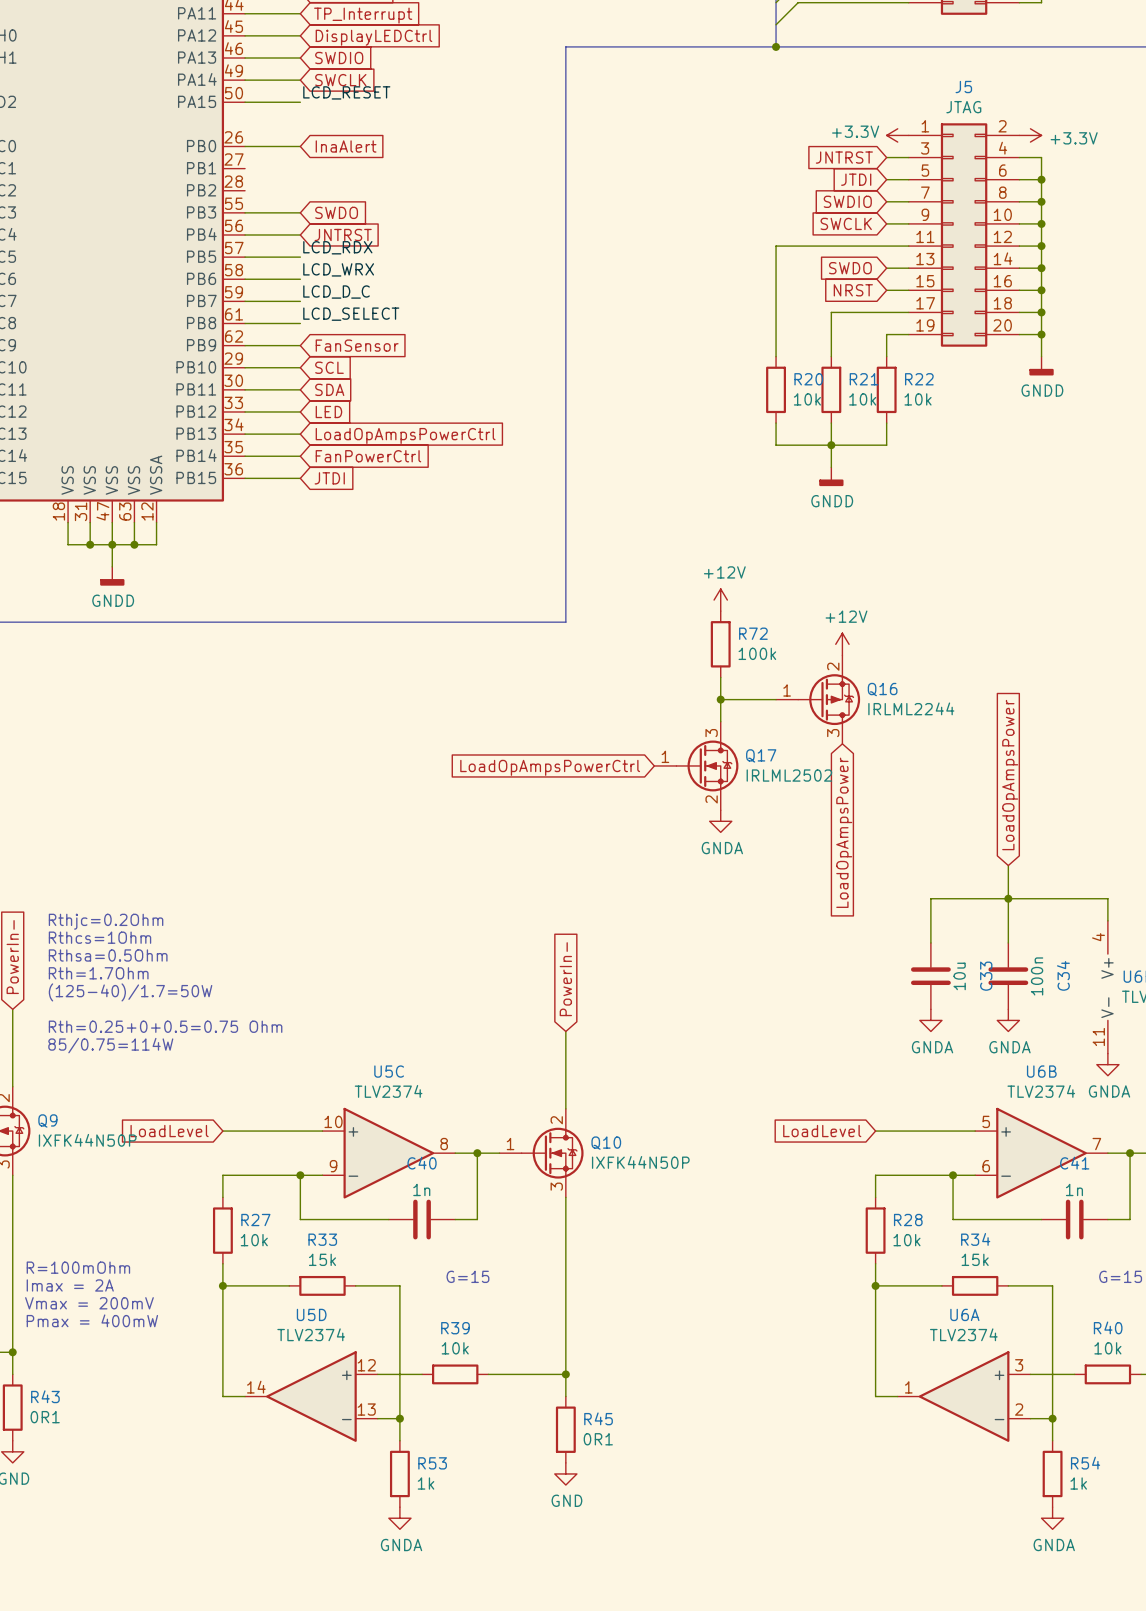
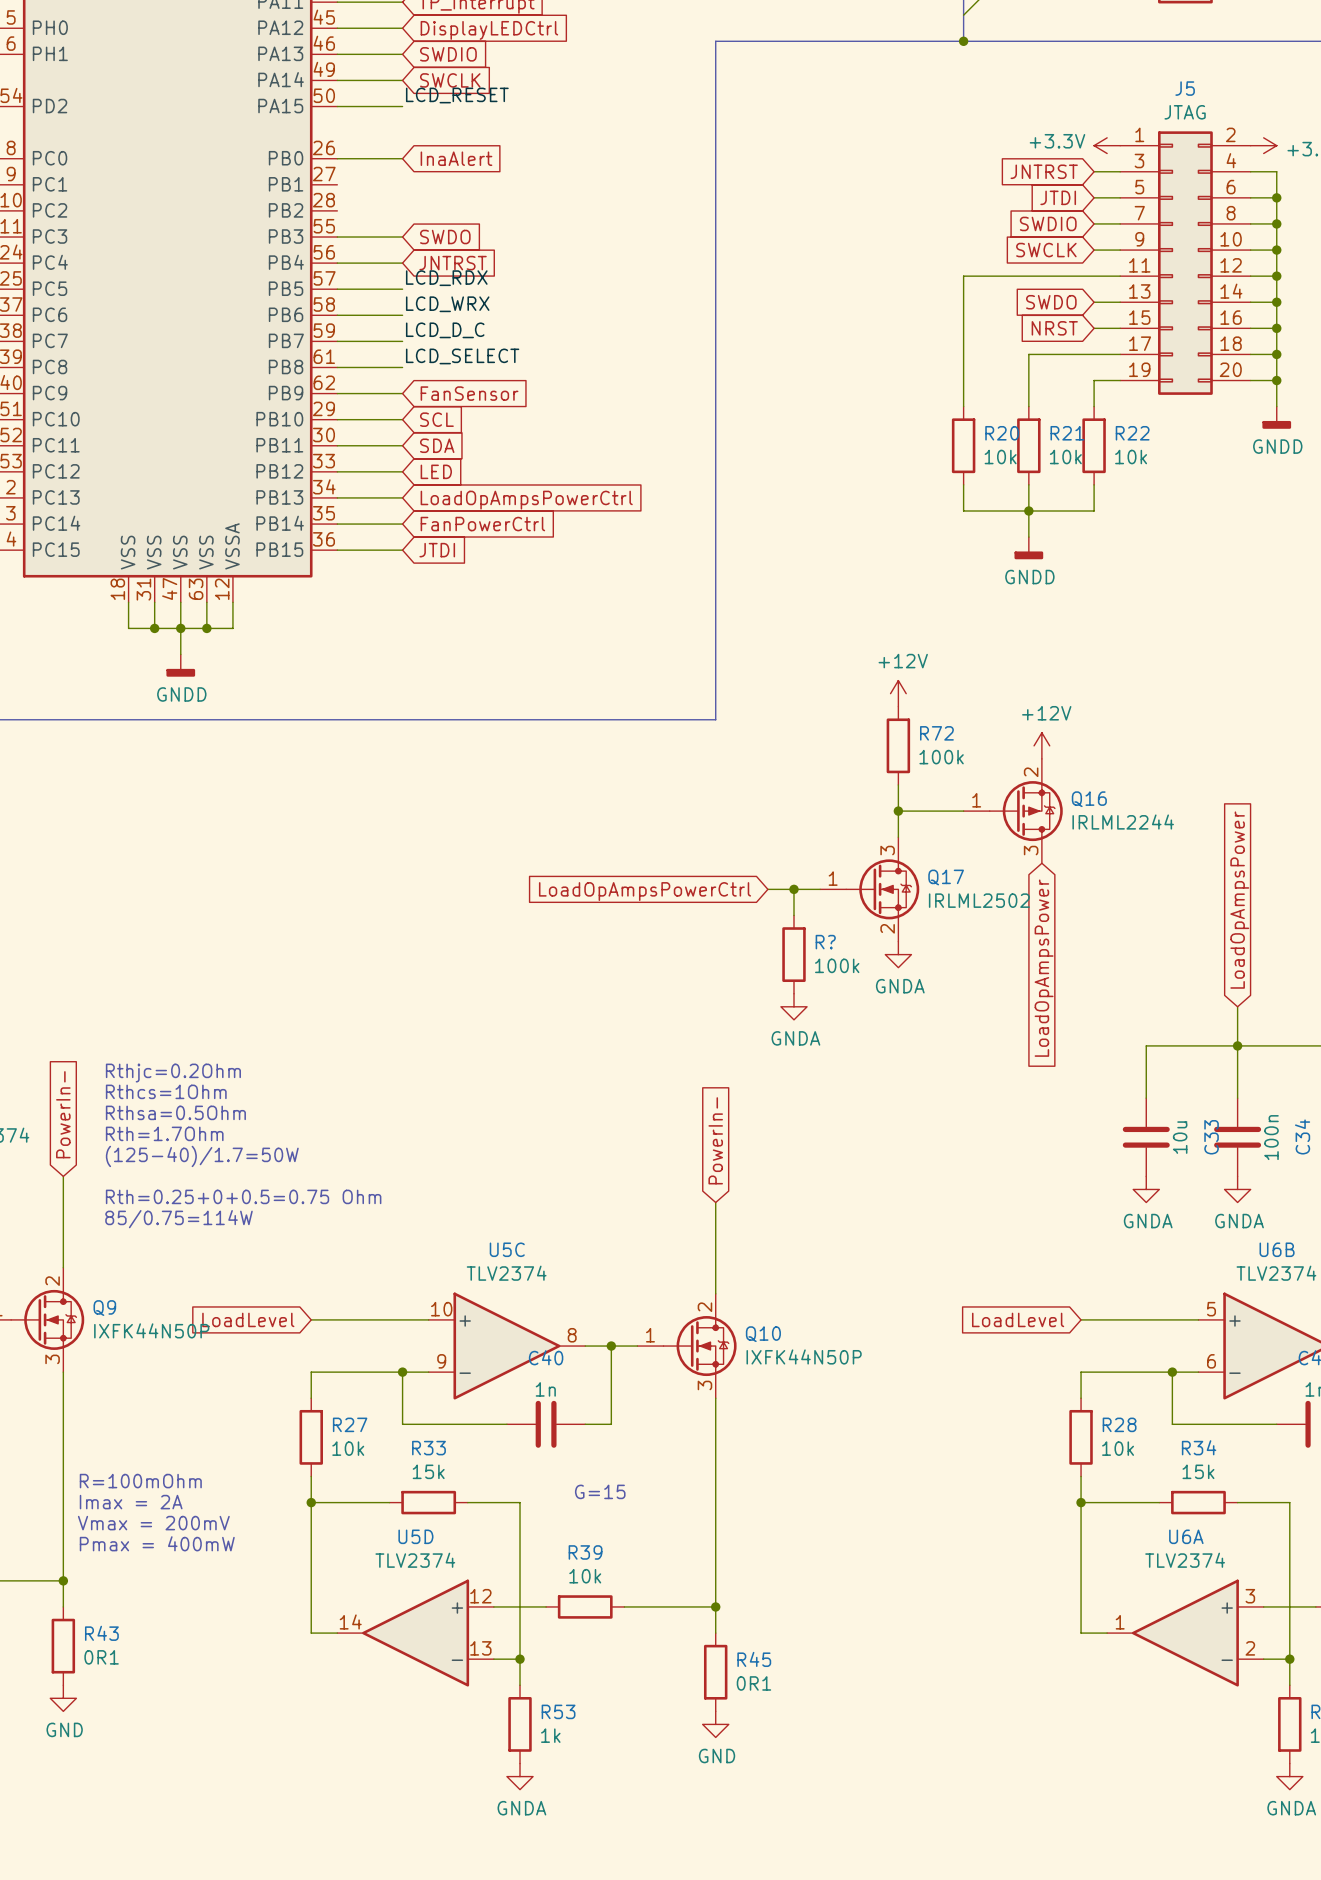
wire: none -> (767, 889) (820, 889)
wire: none -> (793, 889) (793, 915)
junction: none -> (793, 889)
global label position: LoadOpAmpsPowerCtrl (550, 767) -> LoadOpAmpsPowerCtrl (645, 891)
R?: none -> 100k (793, 954)
power symbol: none -> GNDA (793, 1006)

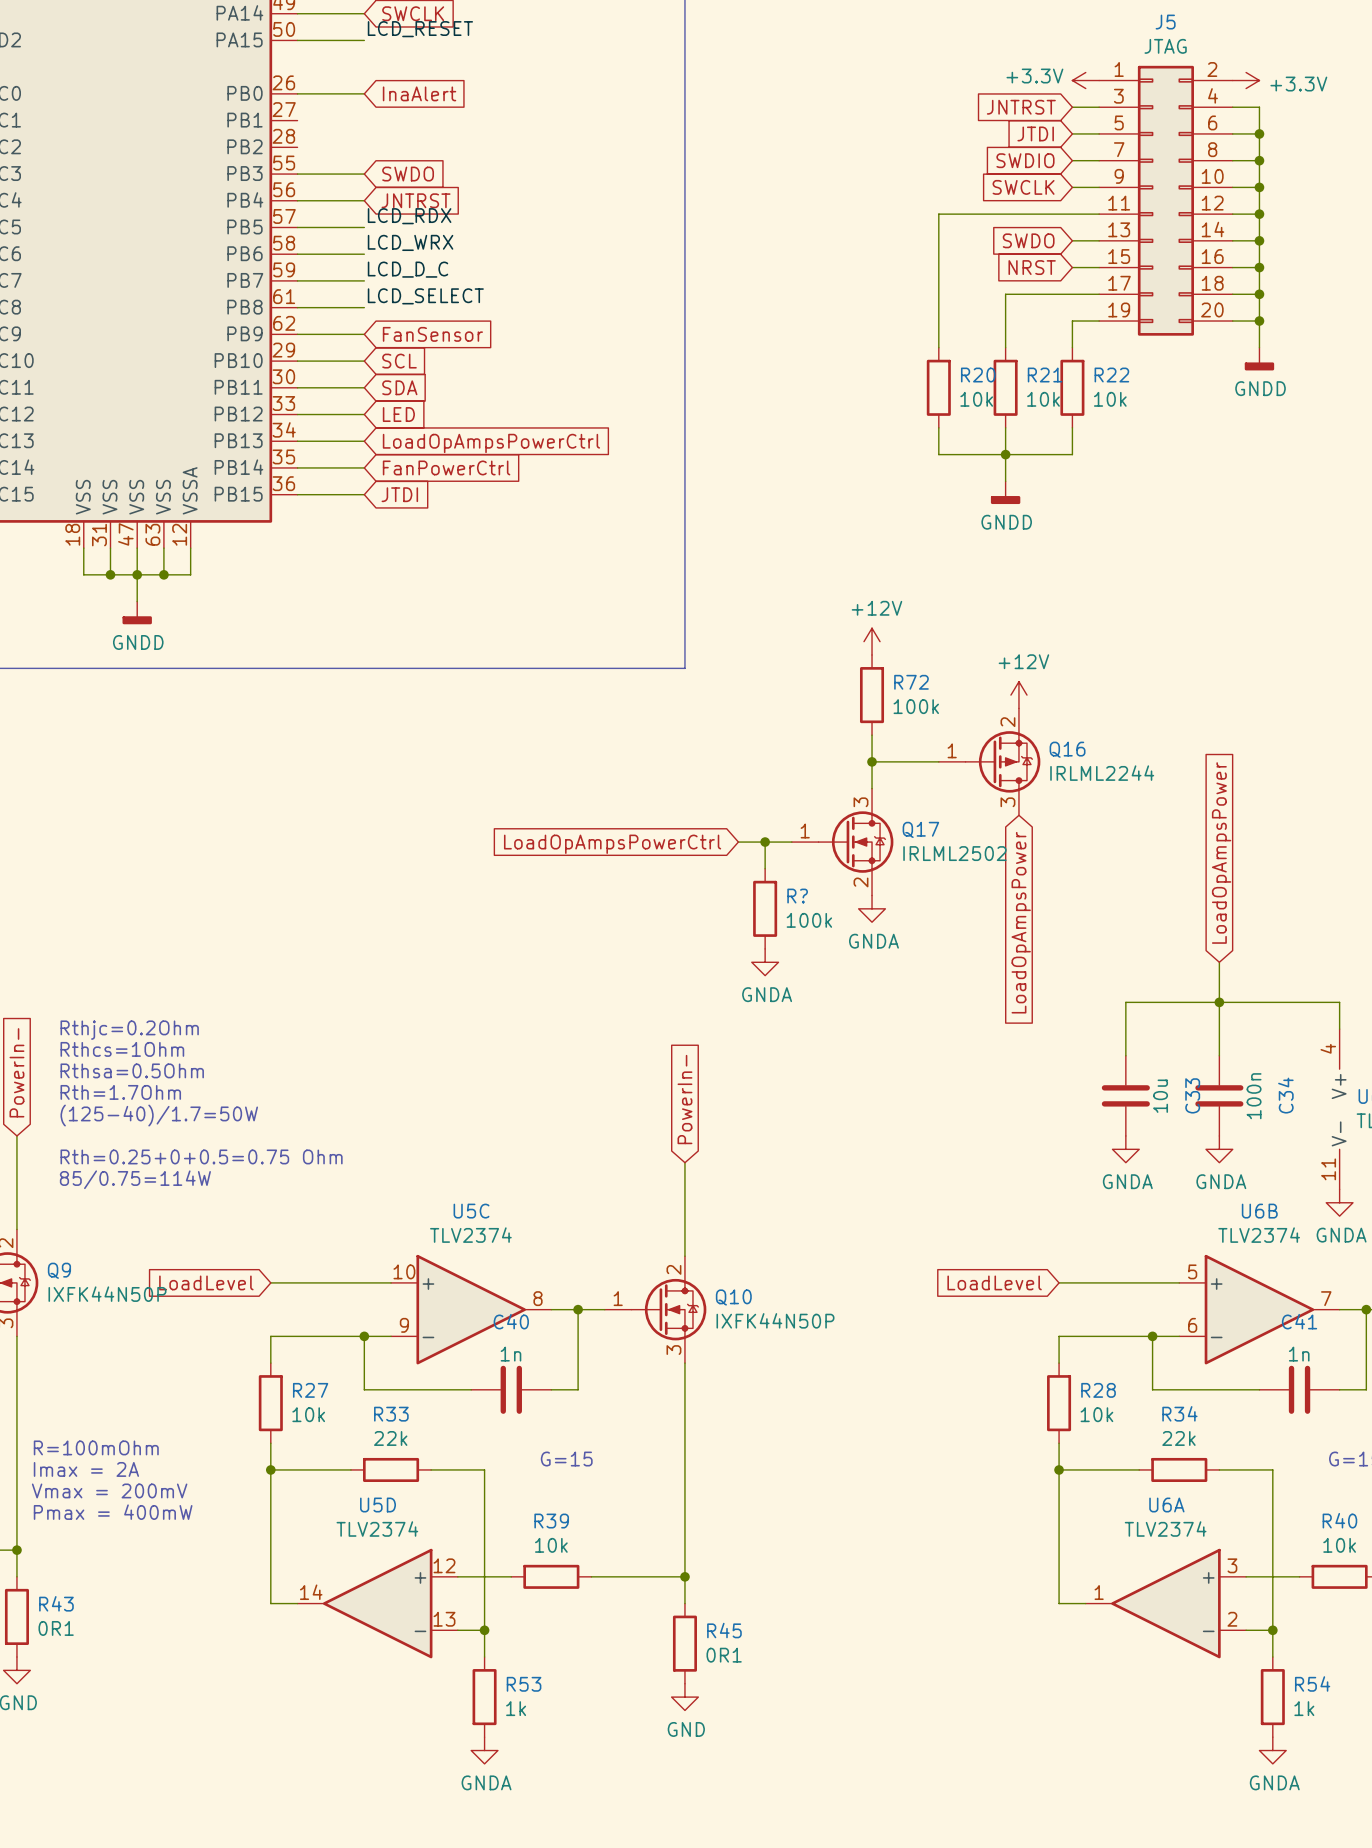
R33 value: 15k (428, 1471) -> 22k (390, 1438)
R34 value: 15k (1198, 1471) -> 22k (1178, 1438)

